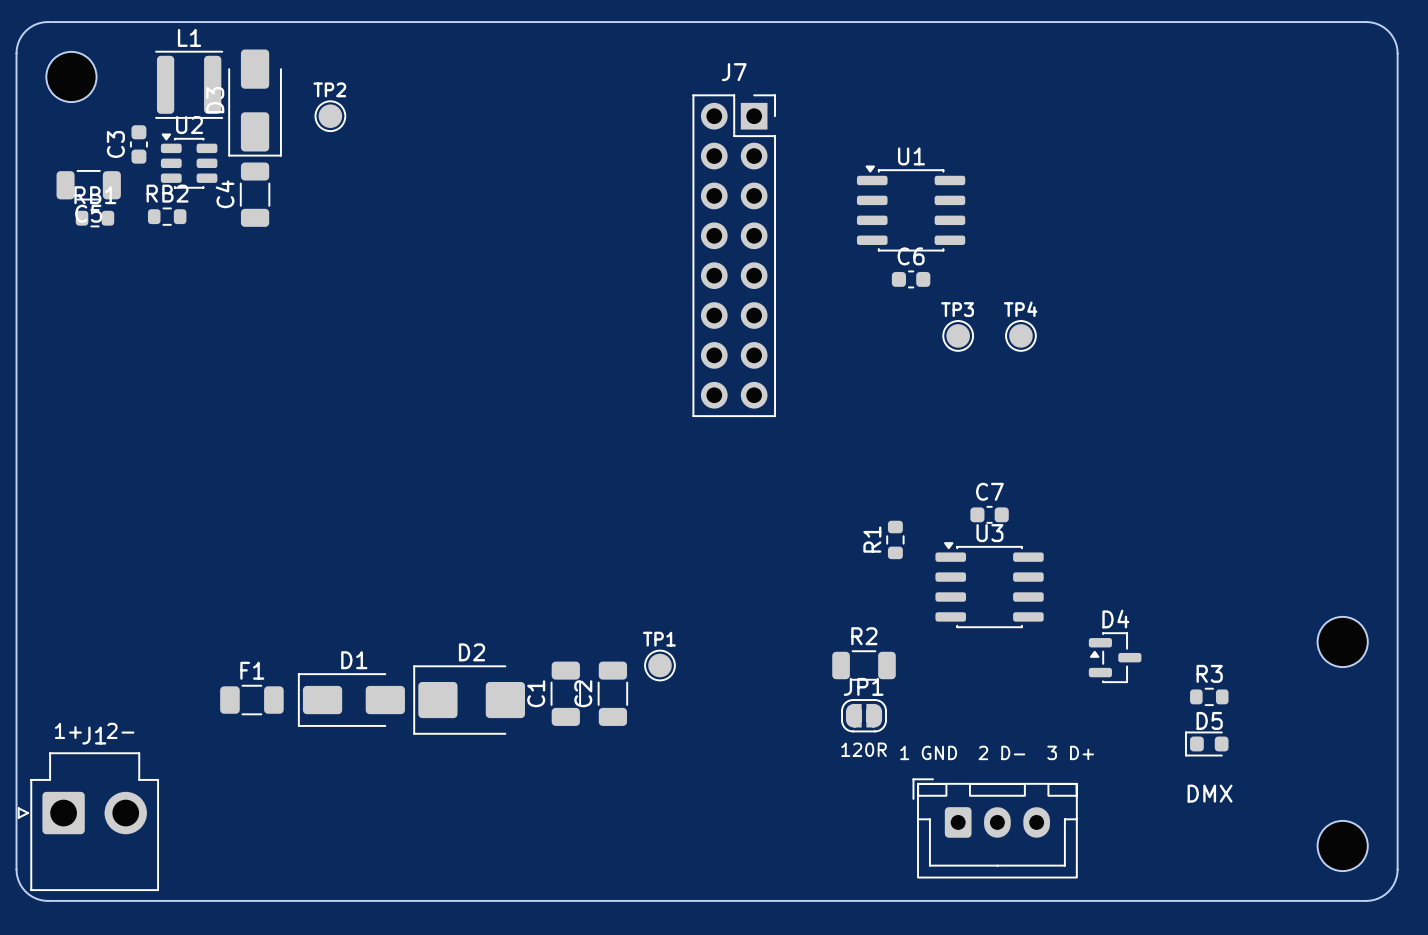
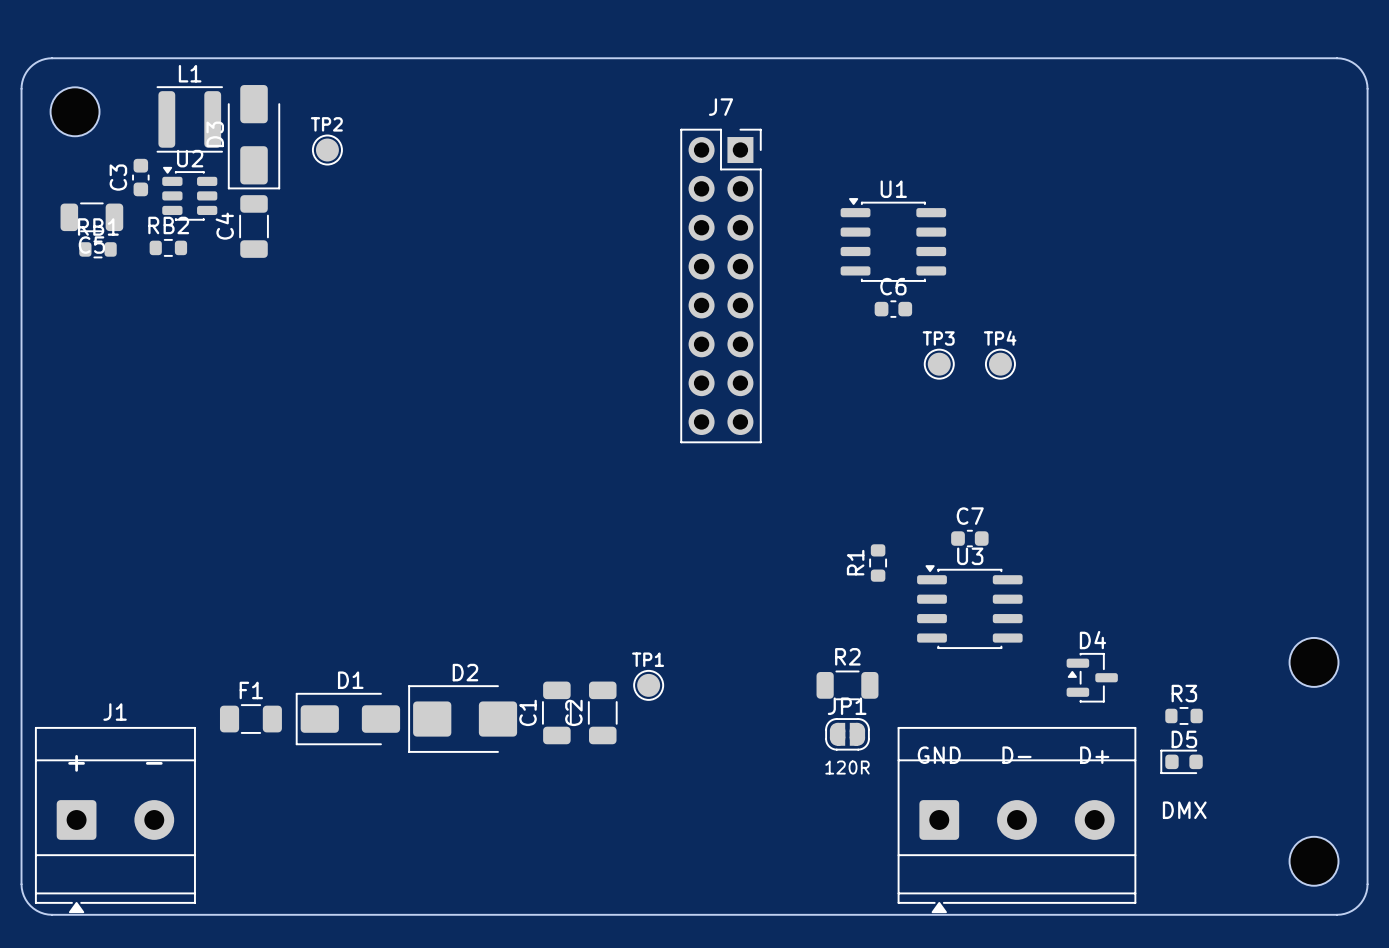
text: 1+ 2- (94, 730) -> none
text: none -> GND (939, 755)
text: none -> D- (1016, 755)
text: none -> D+ (1094, 755)
text: none -> + (76, 763)
text: none -> - (154, 763)
J1 footprint: [17, 752, 160, 892] -> [34, 726, 196, 914]
text: 1 GND 2 D- 3 D+ (997, 752) -> none
part: none -> (1016, 820)
part: (995, 828) -> none

